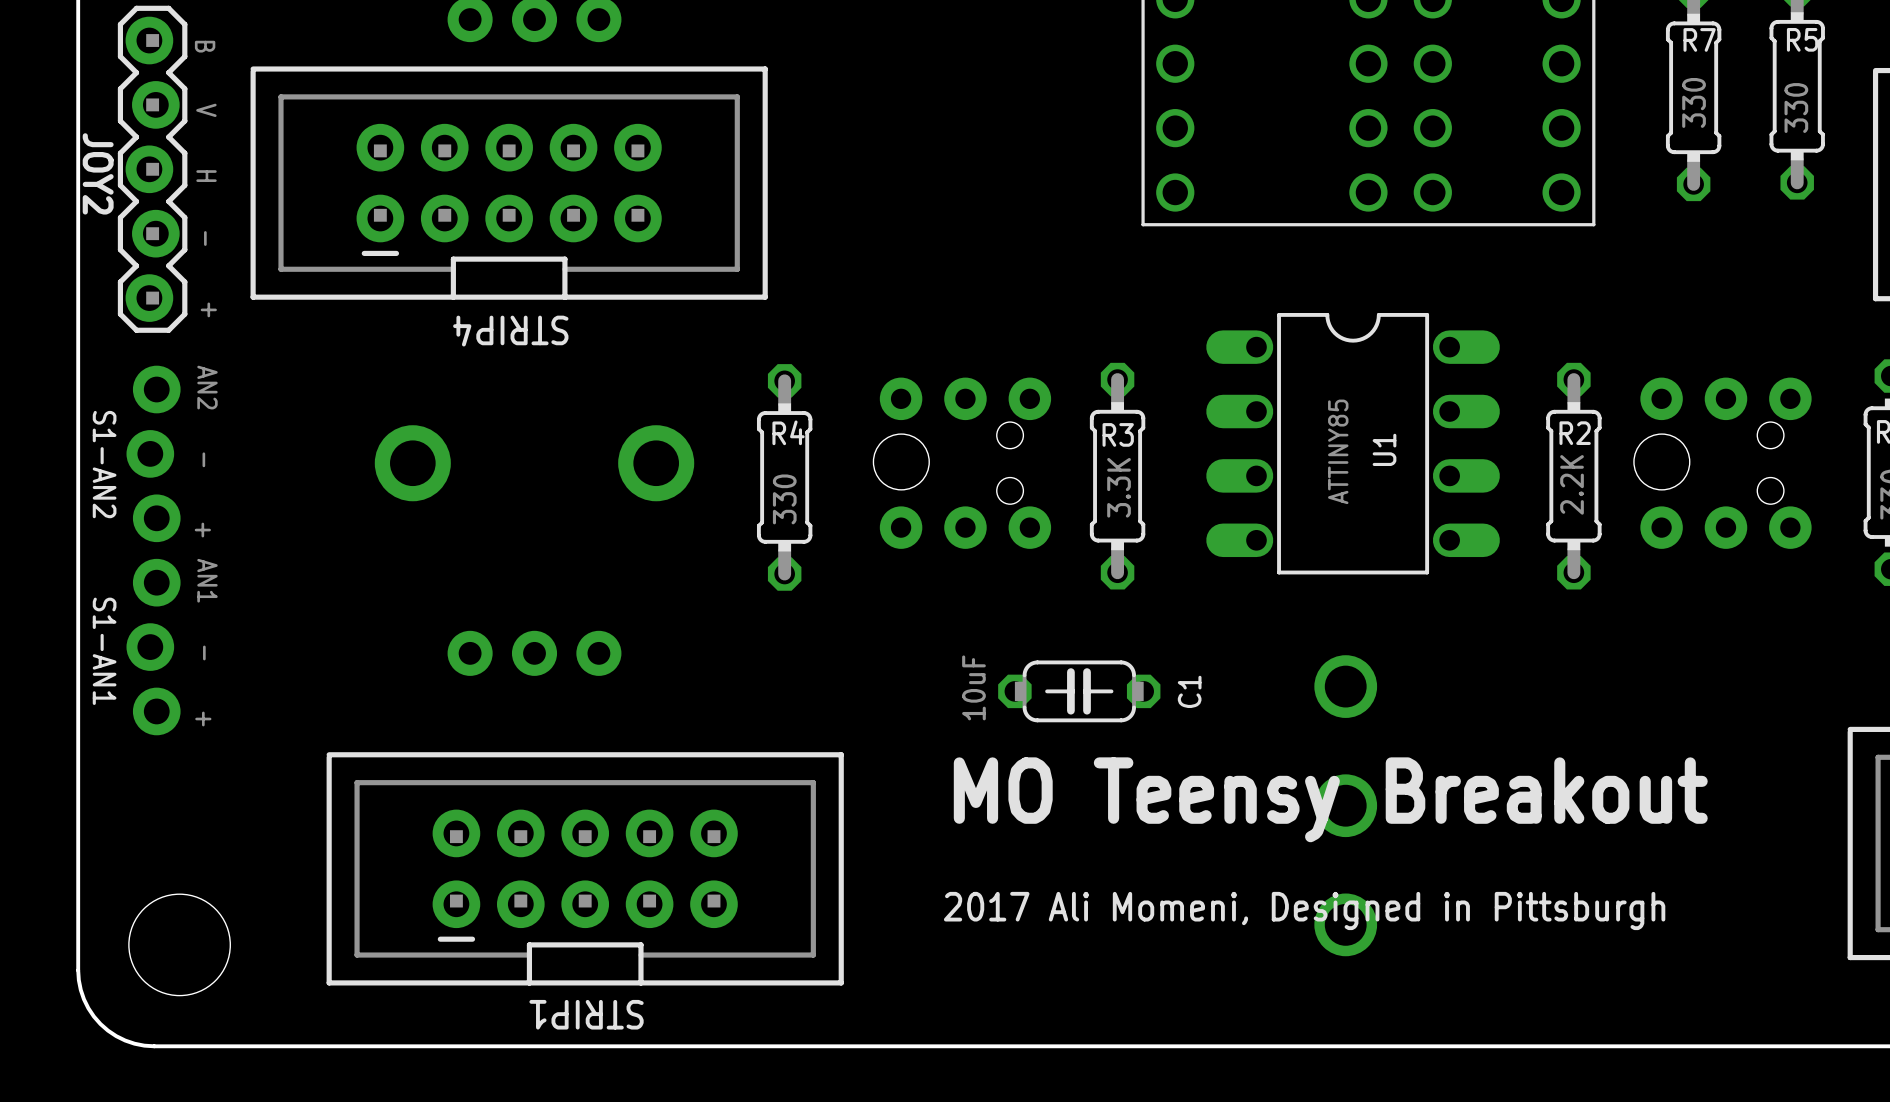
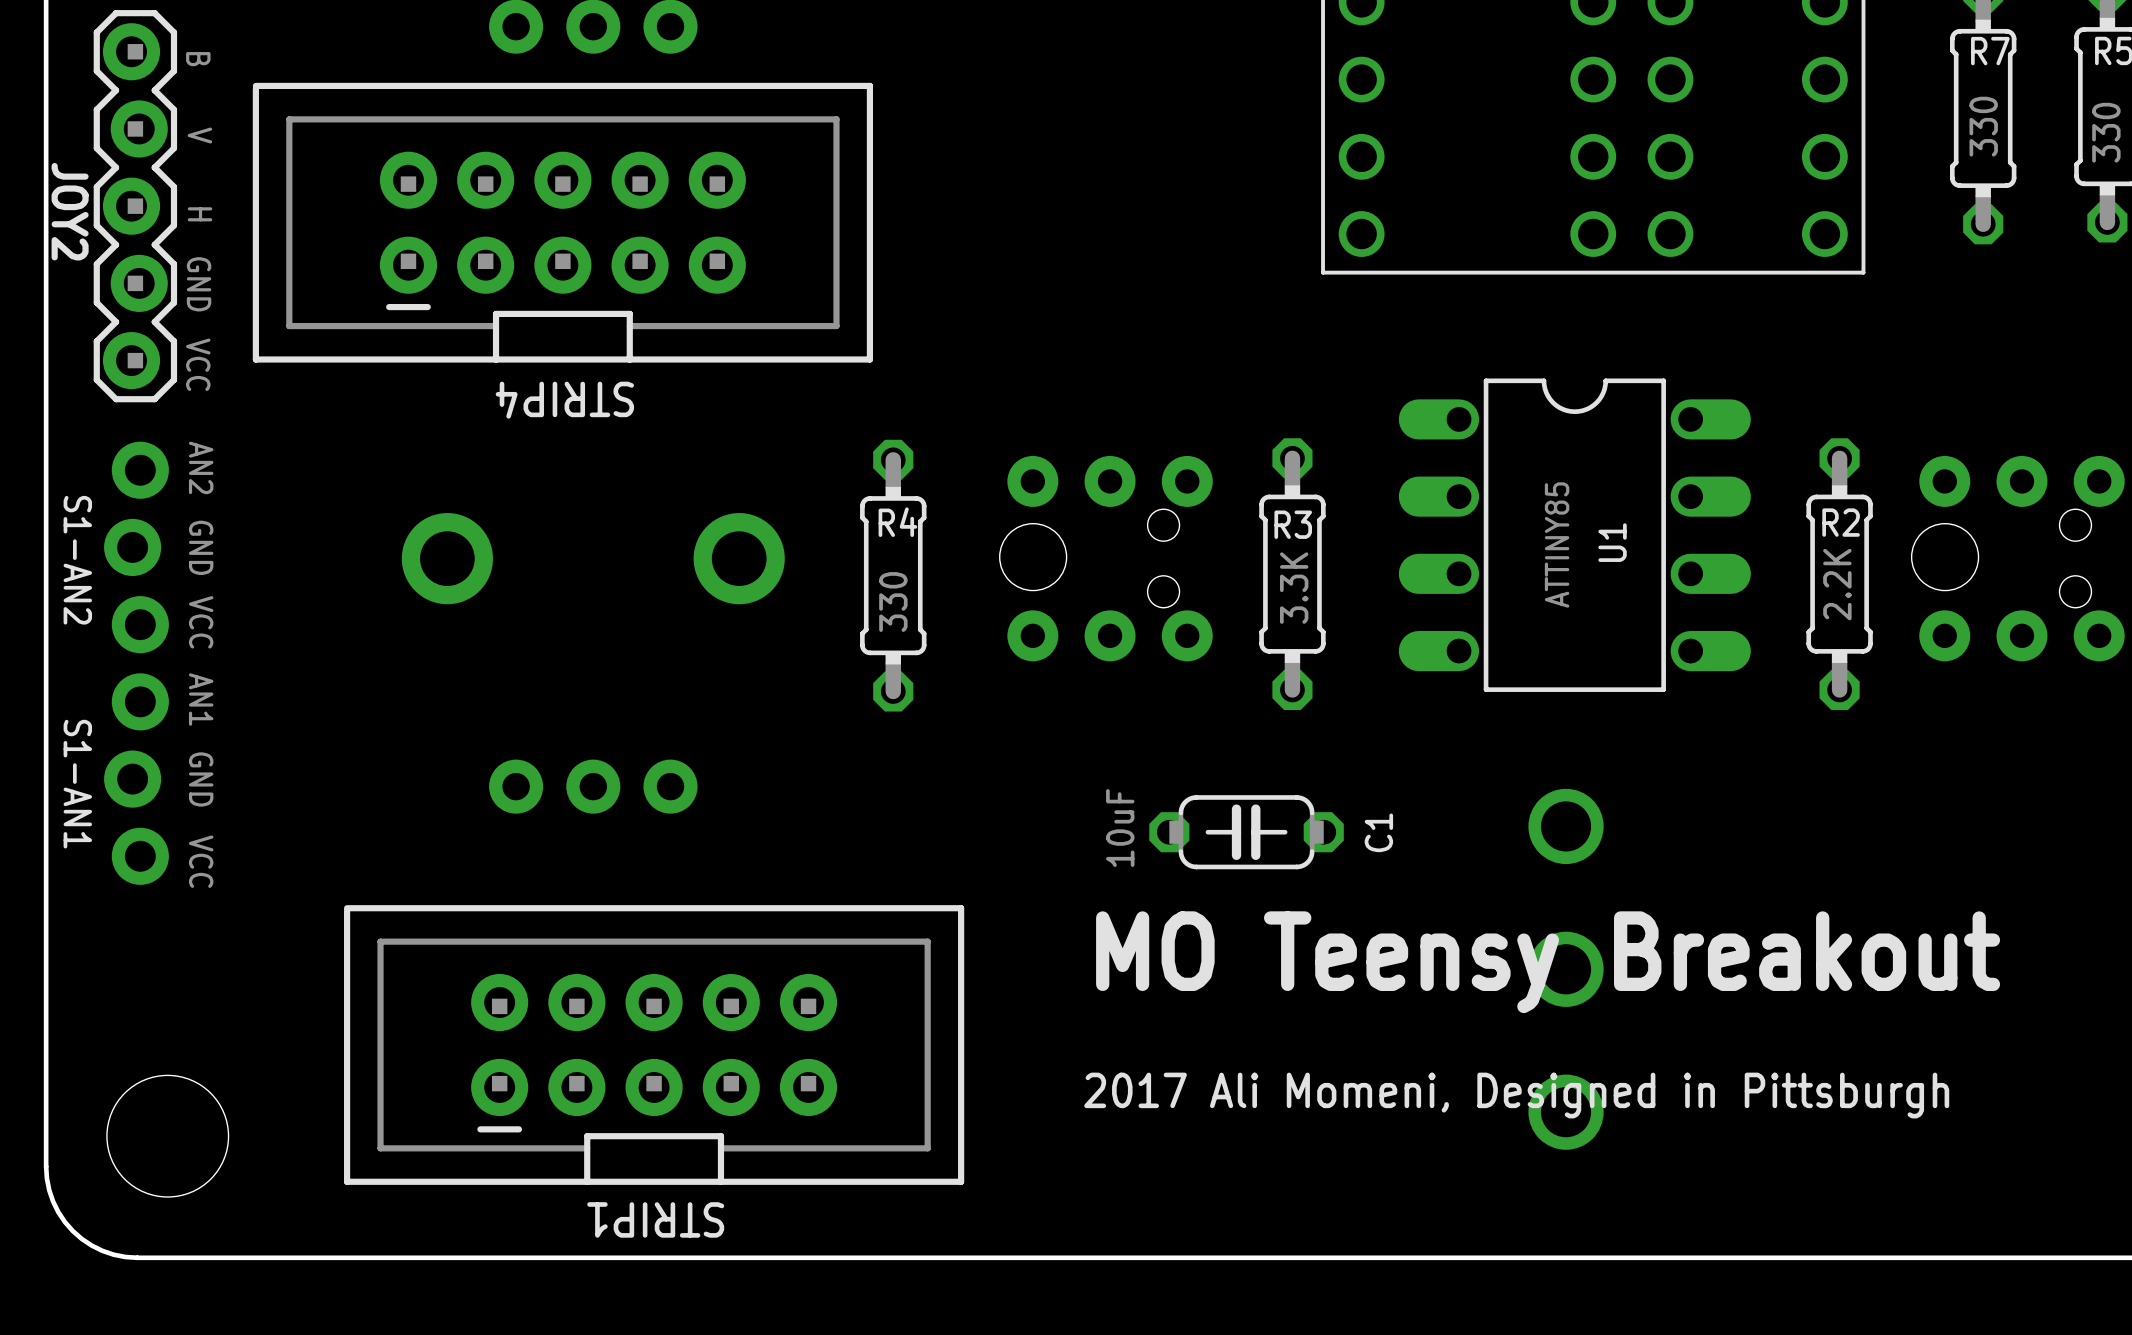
JOY2 text: - (205, 238) -> GND (199, 284)
JOY2 text: + (208, 309) -> VCC (198, 364)
S1-AN2 text: - (203, 459) -> GND (201, 547)
S1-AN2 text: + (202, 530) -> VCC (201, 622)
S1-AN1 text: - (204, 652) -> GND (201, 779)
S1-AN1 text: + (203, 718) -> VCC (201, 861)

